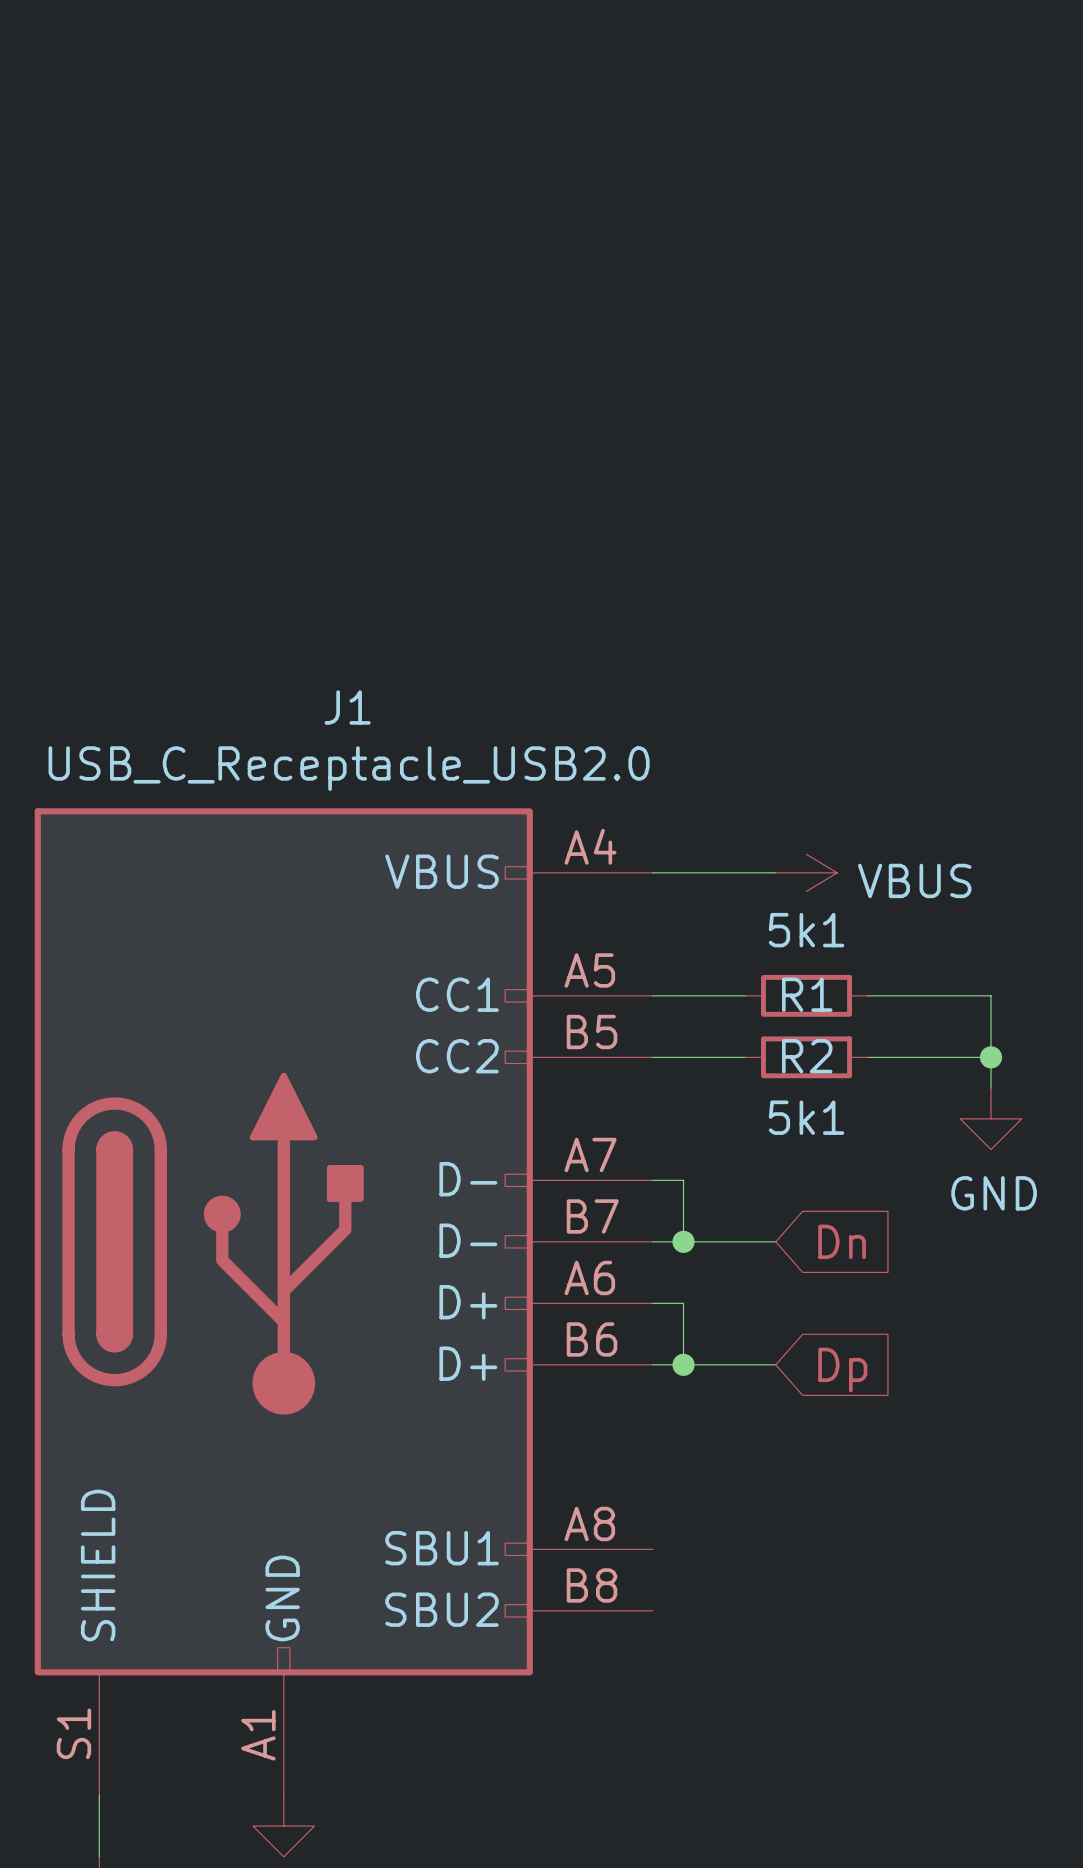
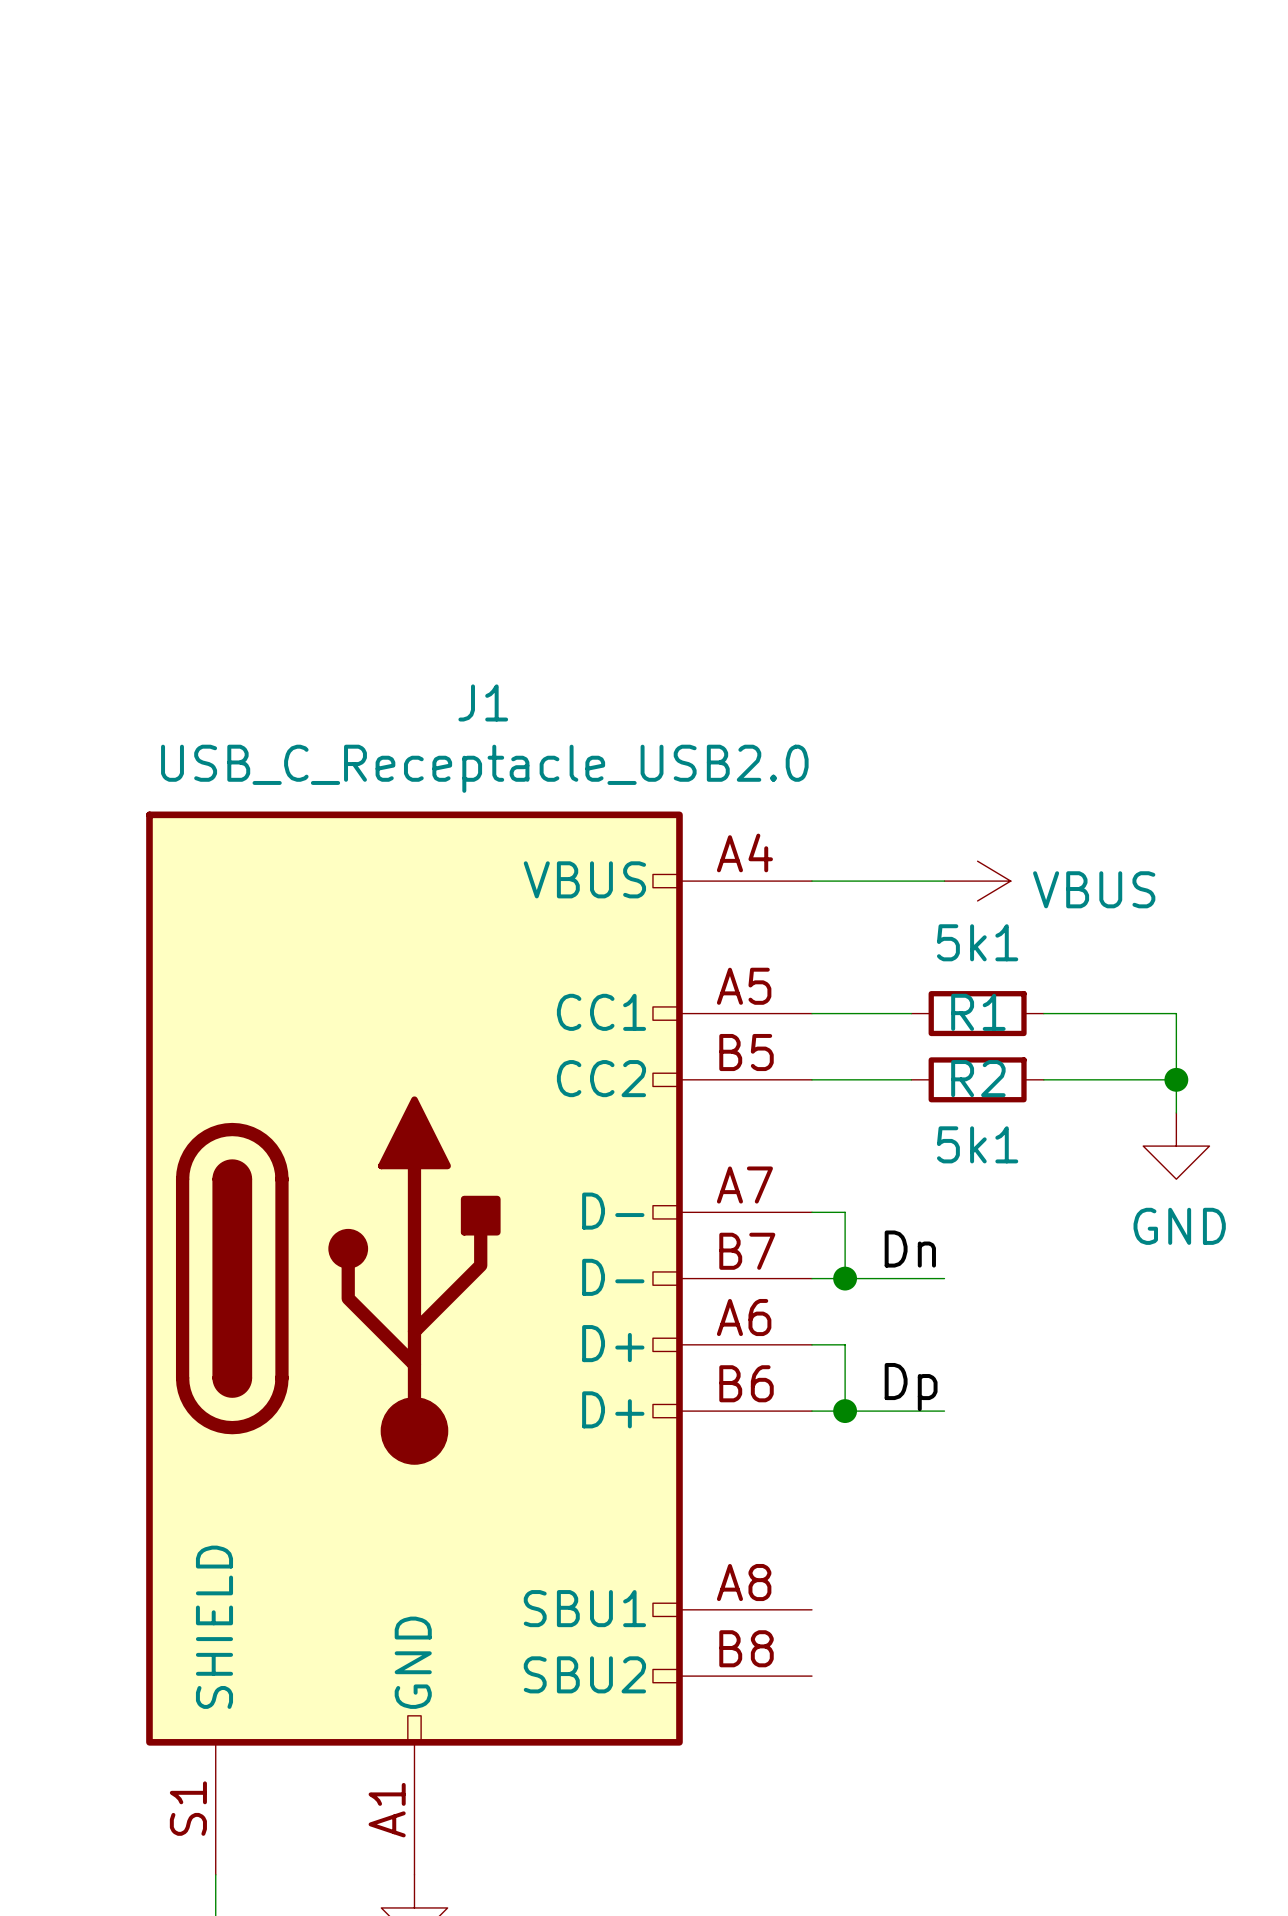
label: none -> Dn (910, 1249)
global label: Dn (842, 1241) -> none
label: none -> Dp (911, 1387)
global label: Dp (842, 1369) -> none

